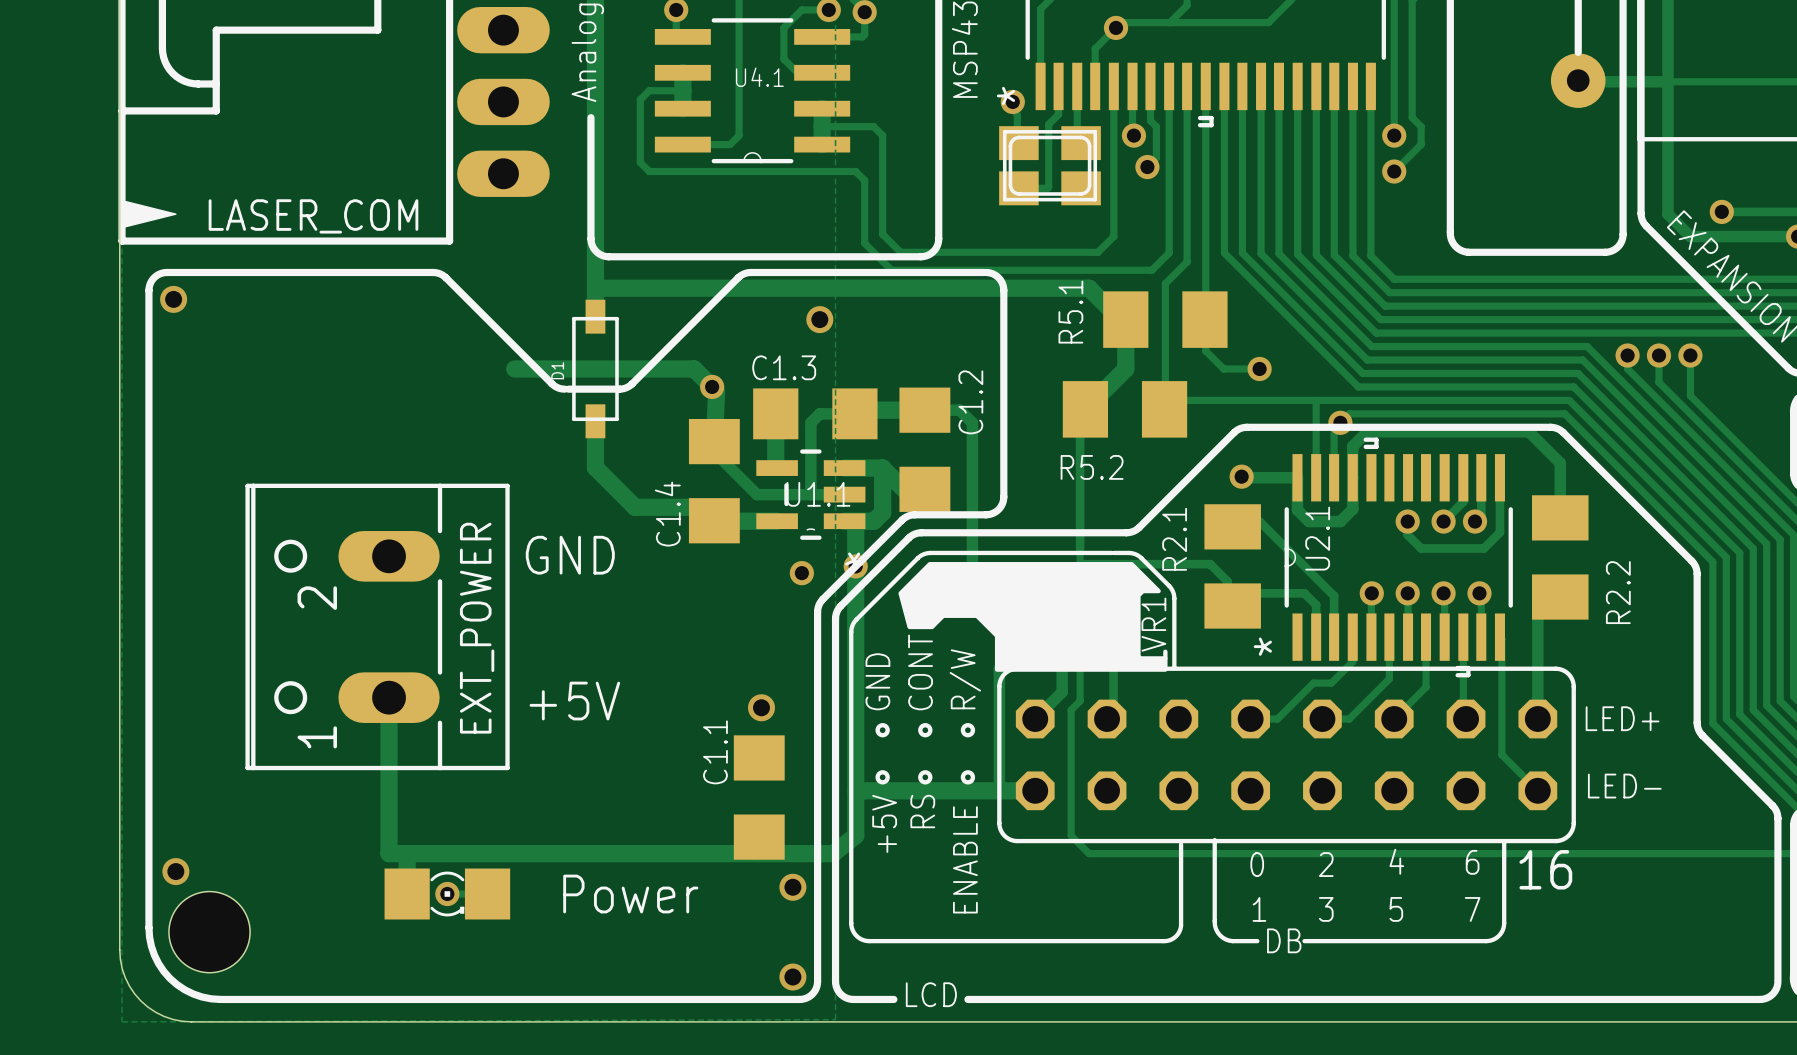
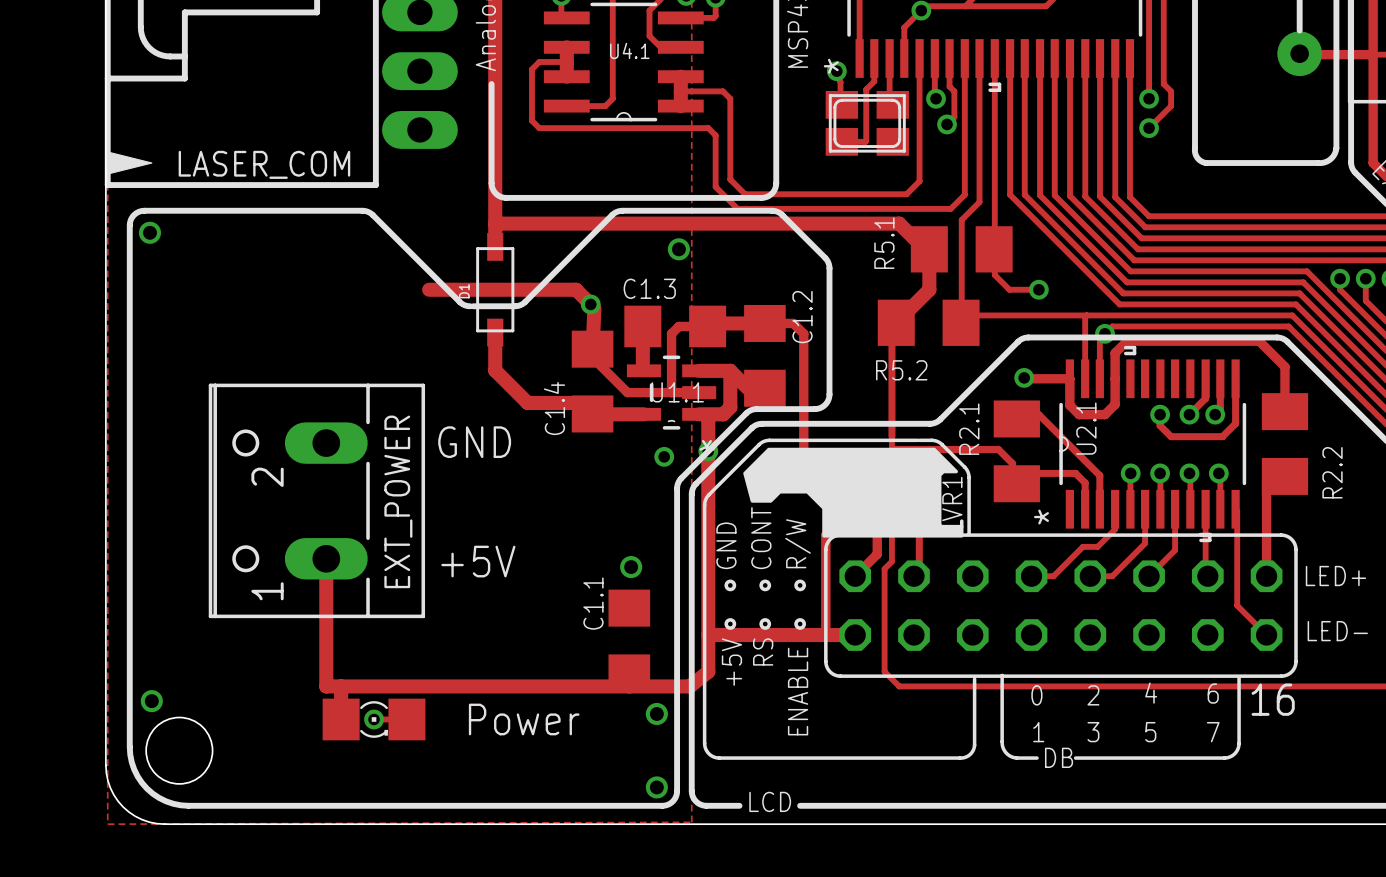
line: (1450, 196) (1451, 239) (1458, 249) (1468, 252) (1612, 250) (1617, 247) (1622, 238) (1623, 196) -> (1194, 148) (1197, 157) (1206, 163) (1320, 163) (1330, 159) (1336, 148)
line: (933, 272) (983, 272) -> none
line: (985, 272) (996, 276) (1003, 285) (1003, 342) -> (771, 210) (782, 215) (825, 257) (829, 268)

